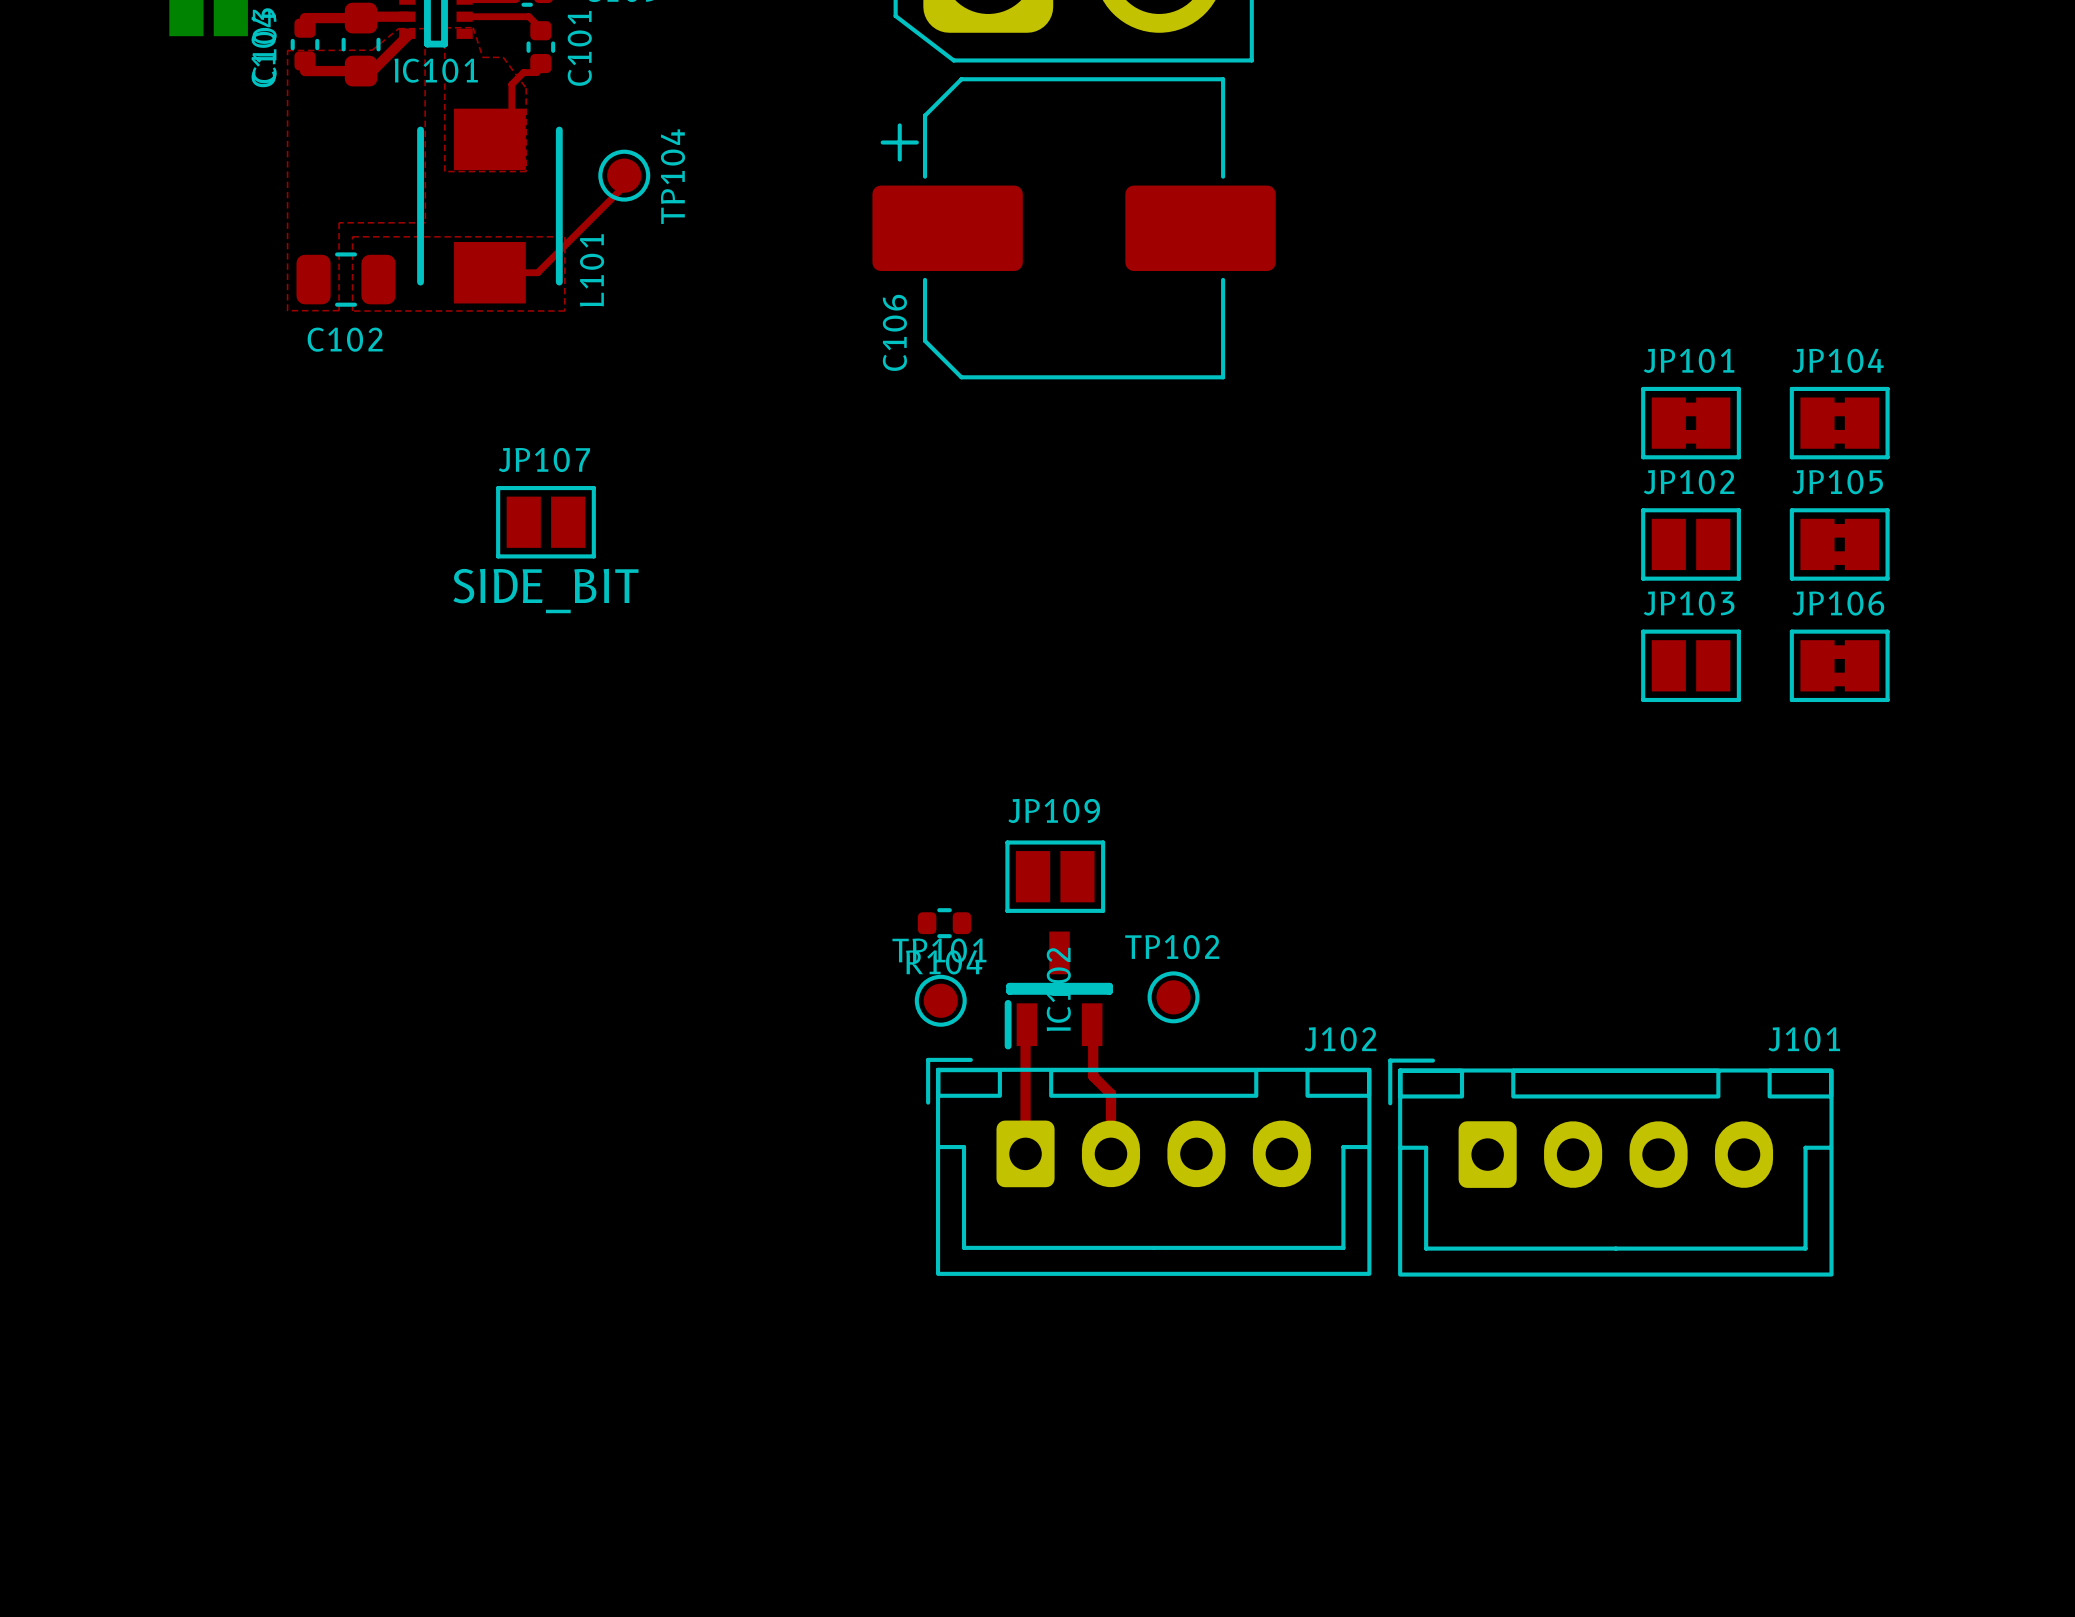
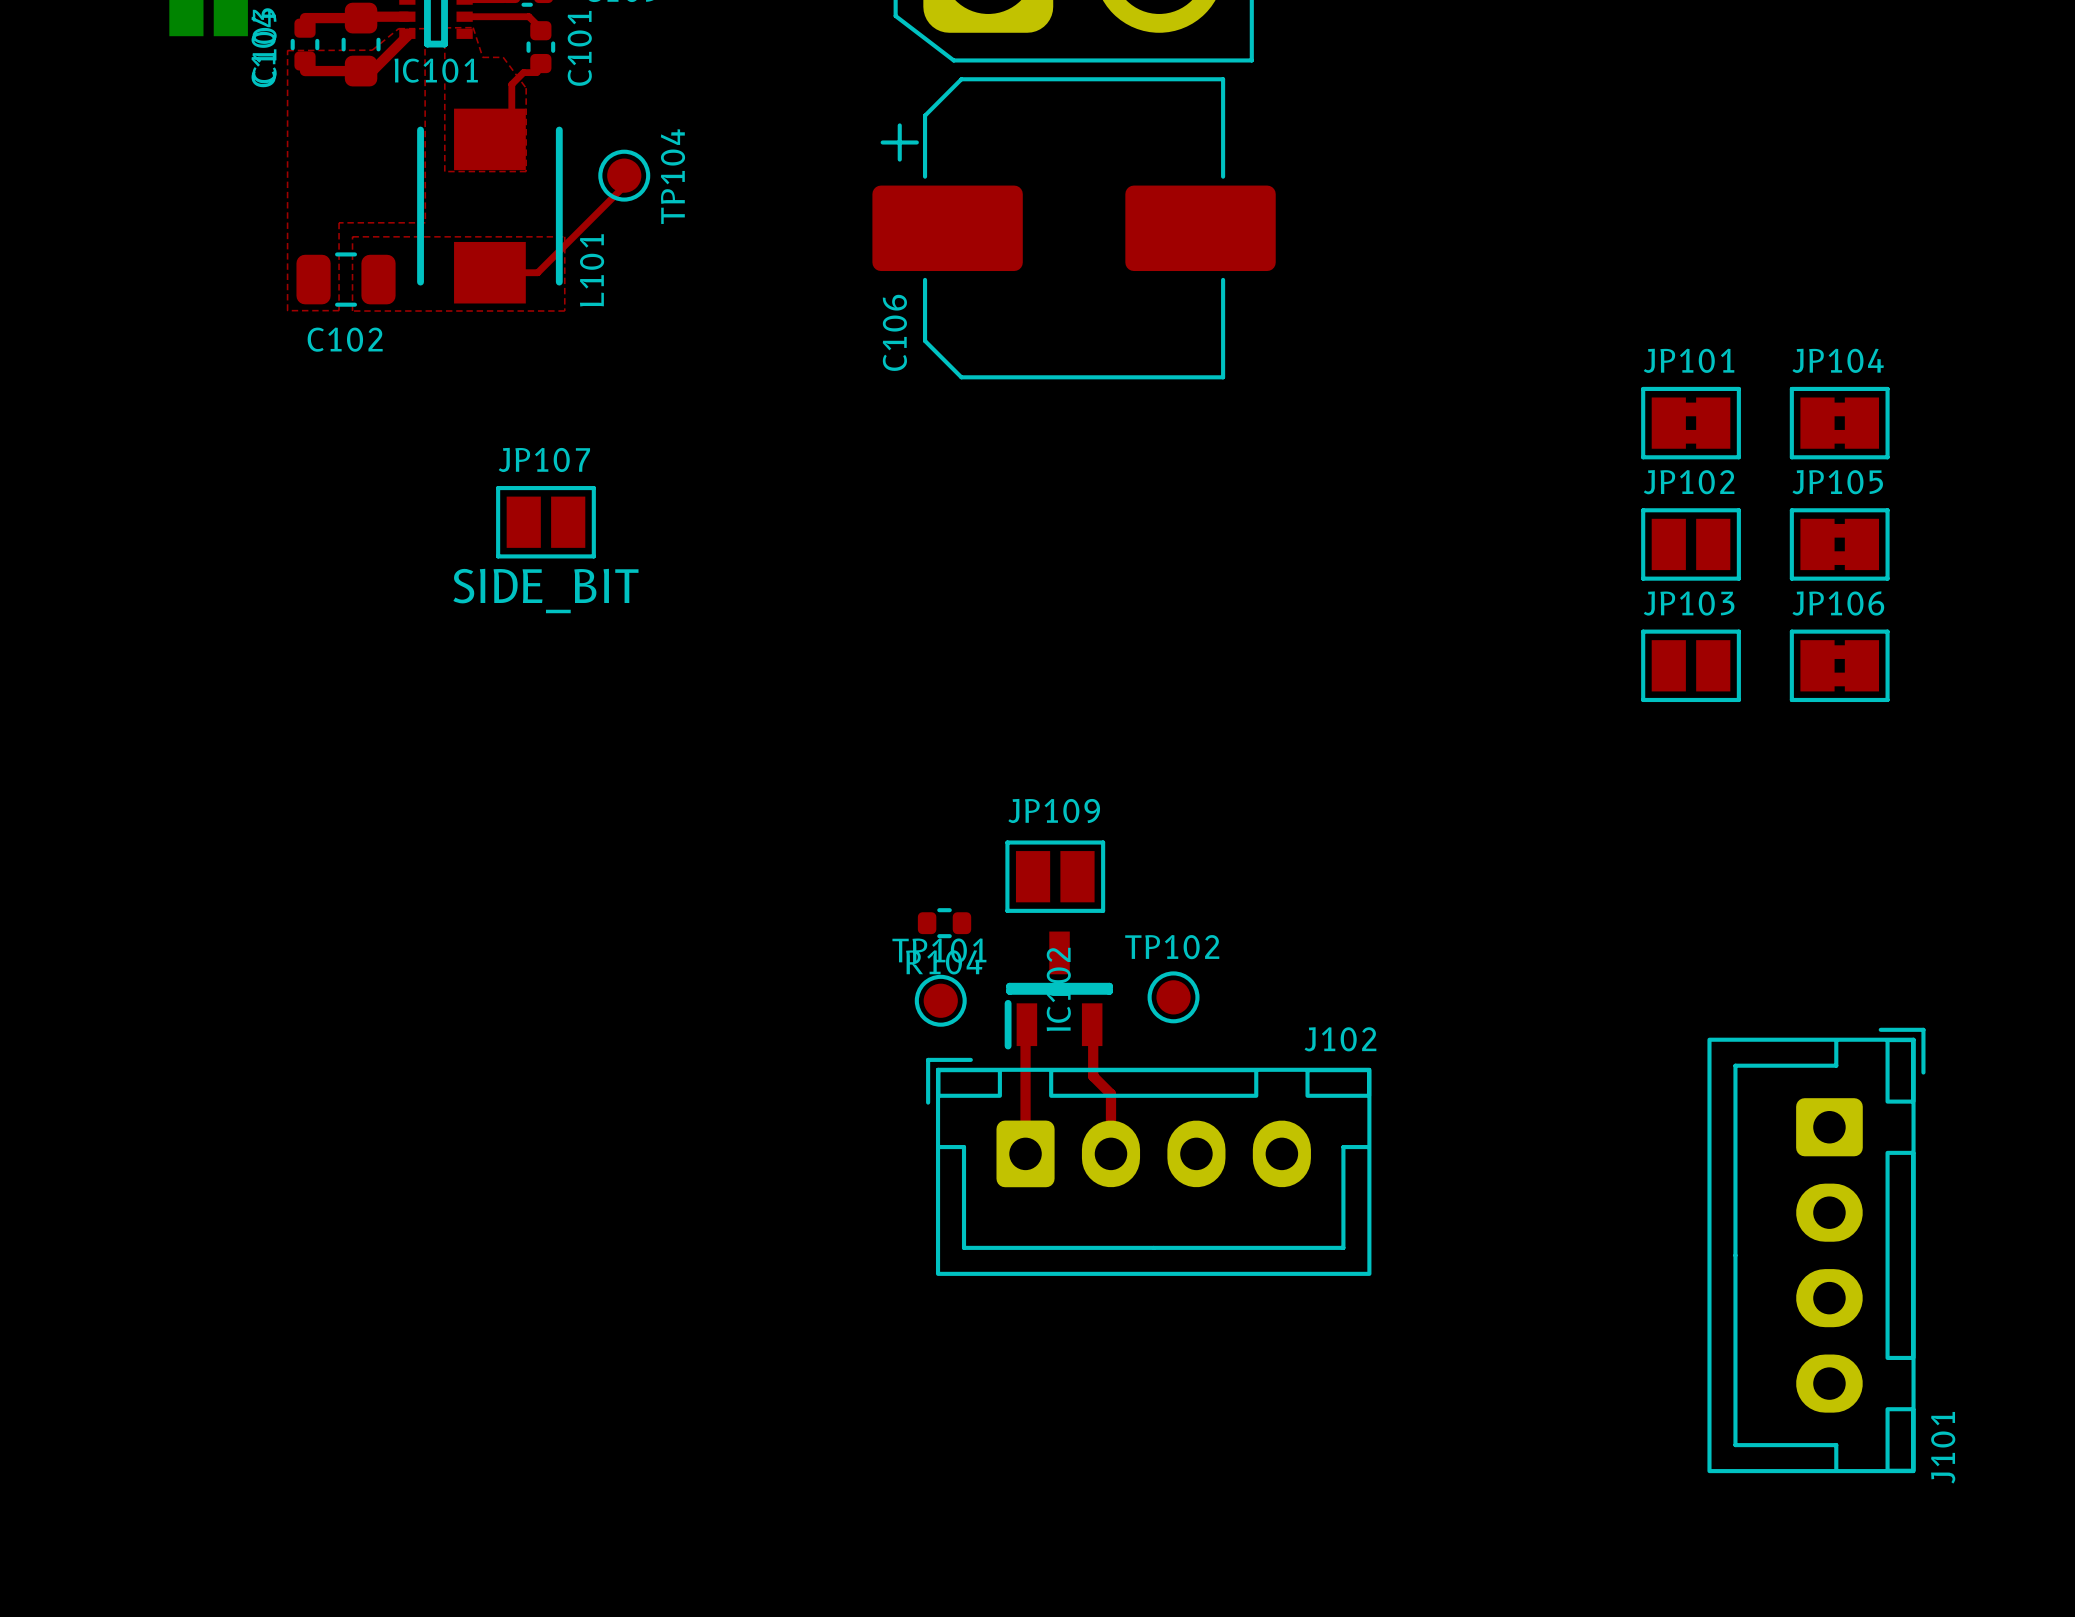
J101 rotation: 0° (1610, 1167) -> 90° clockwise (1816, 1250)

